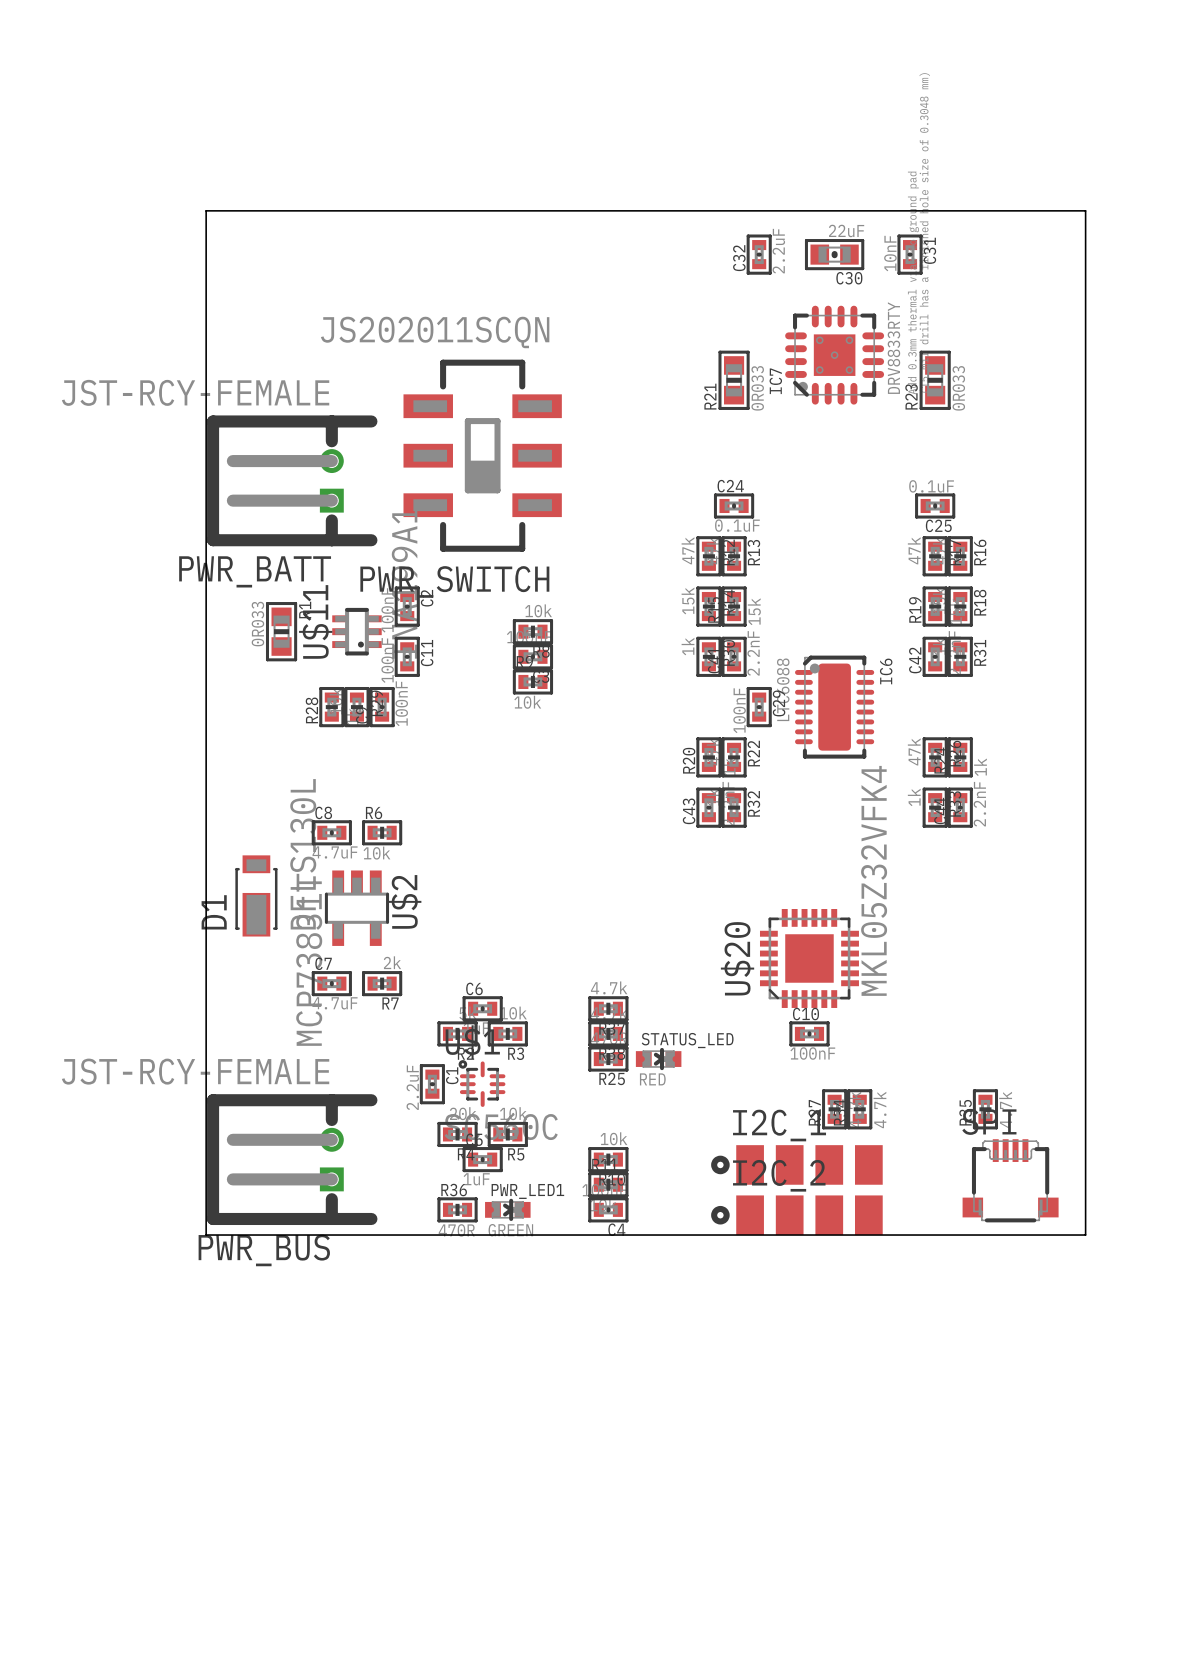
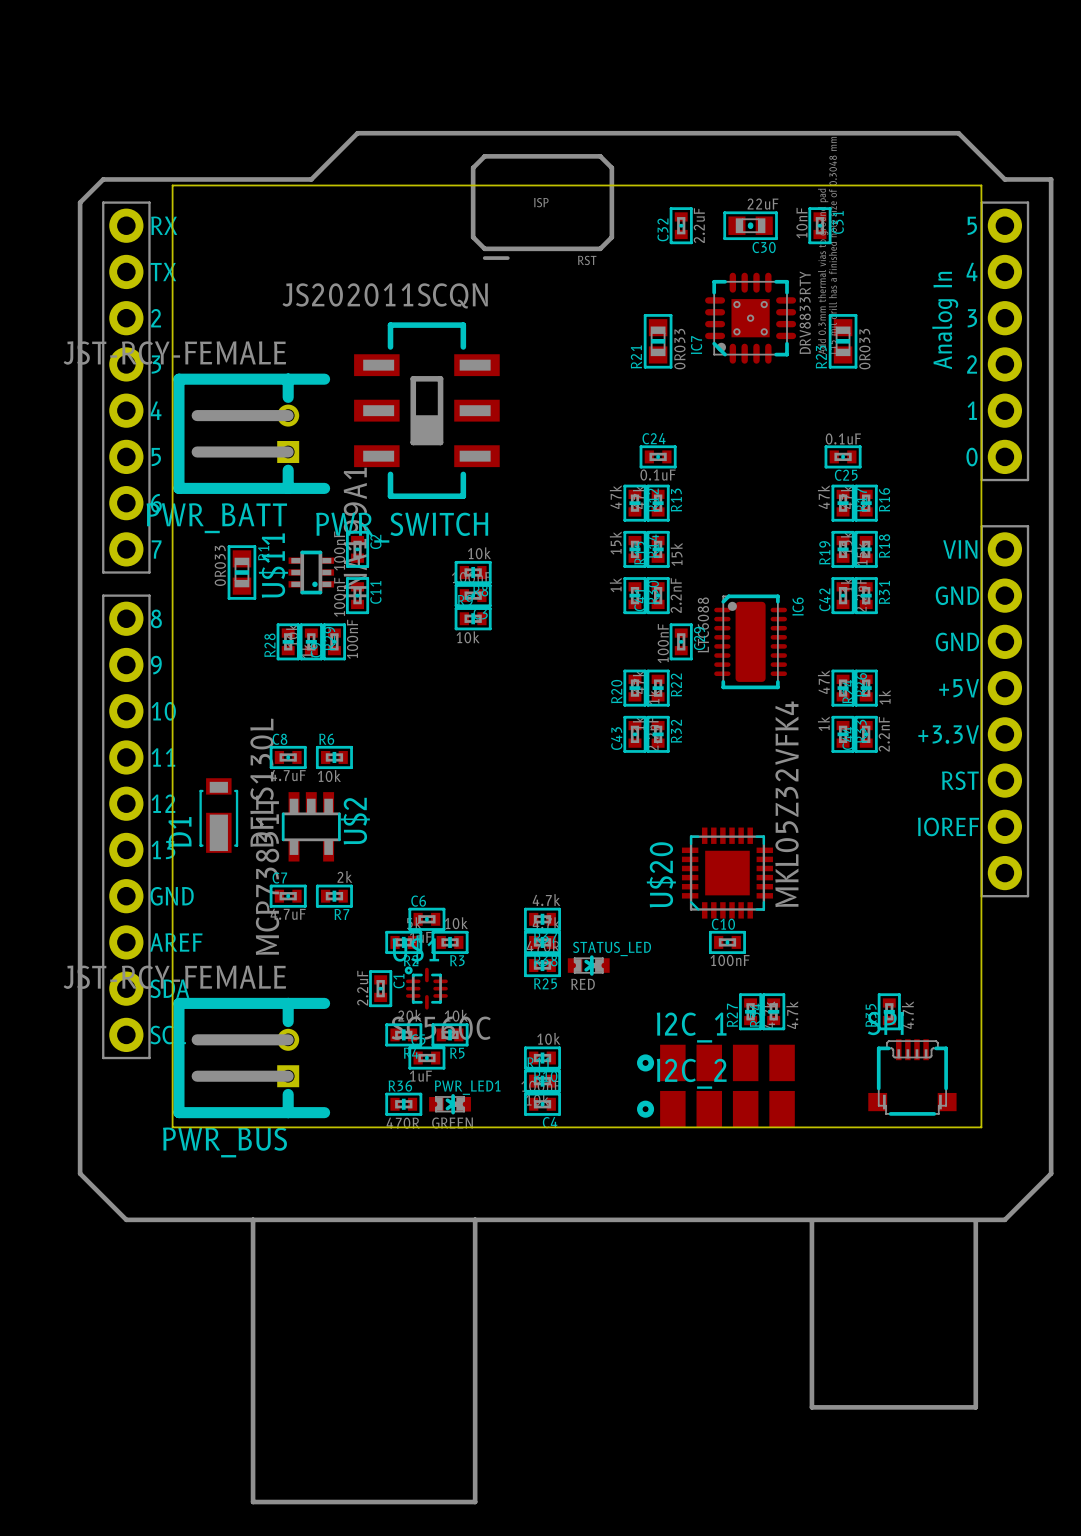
part: none -> (565, 817)

